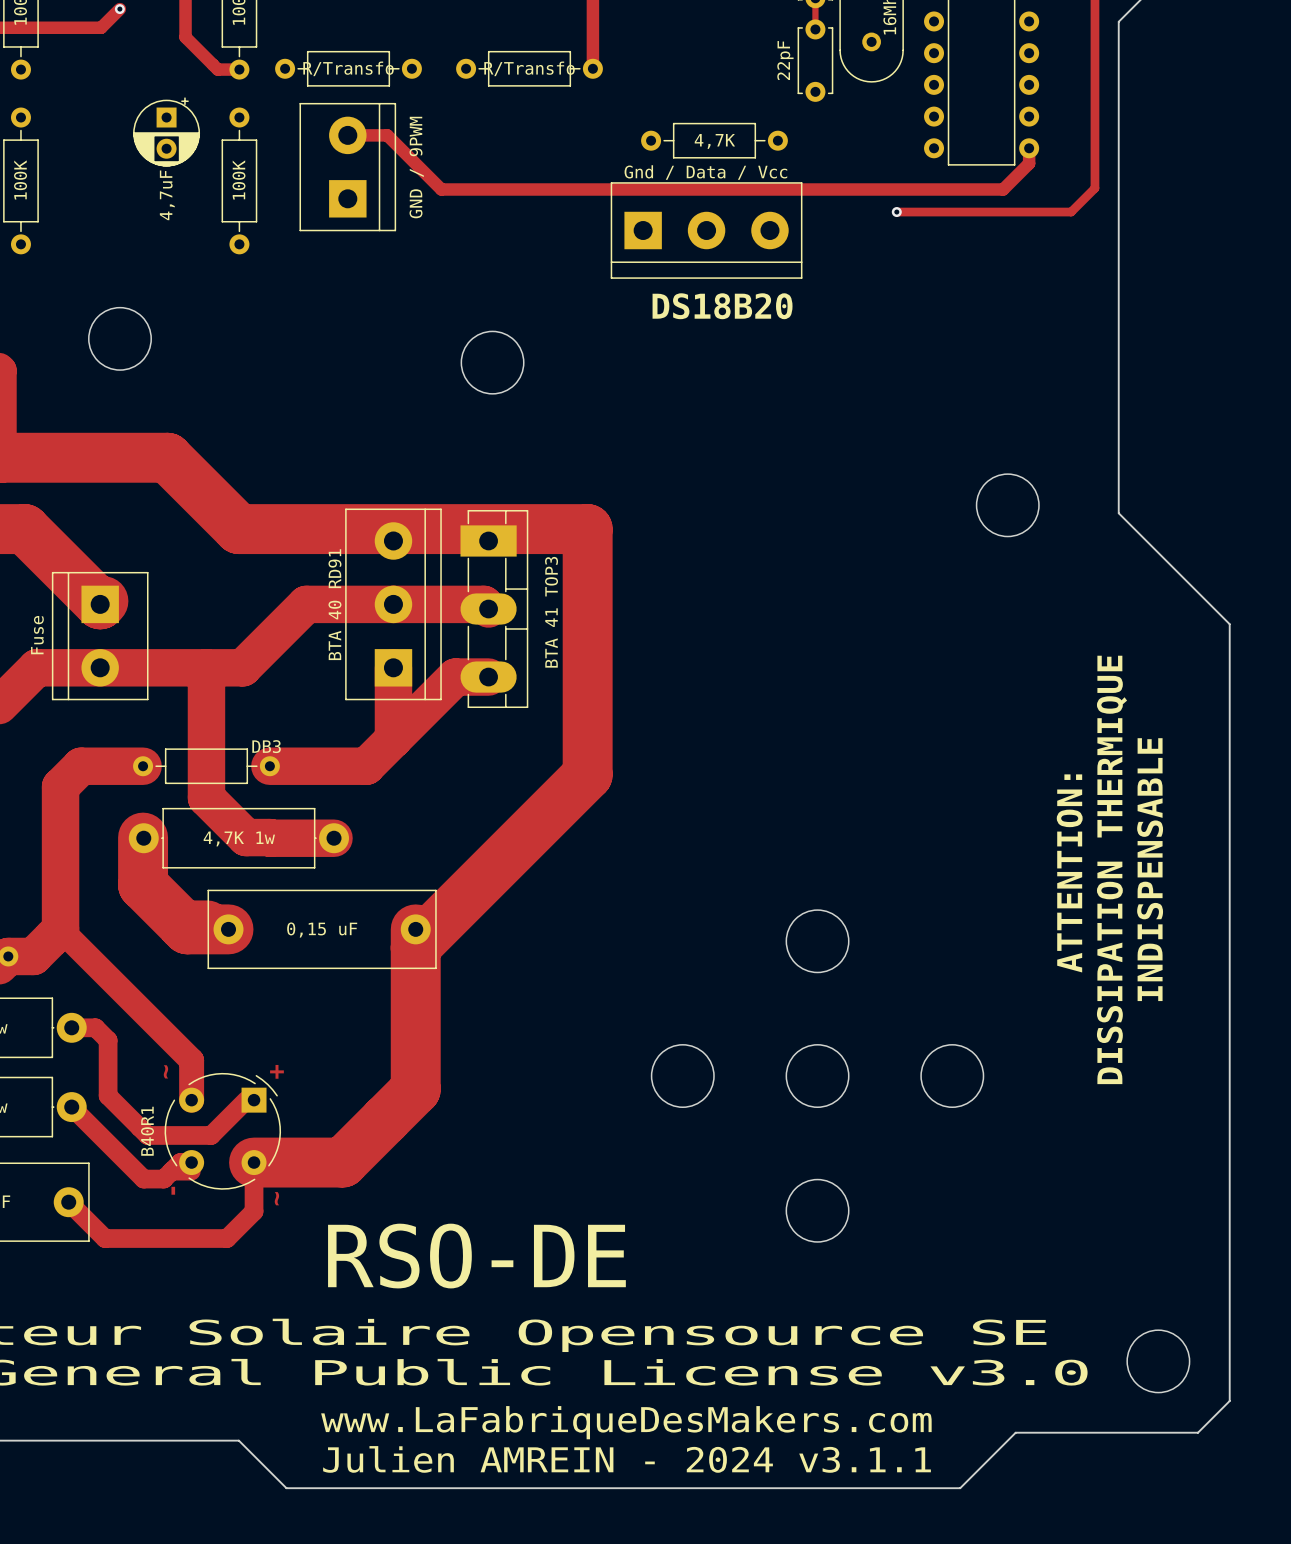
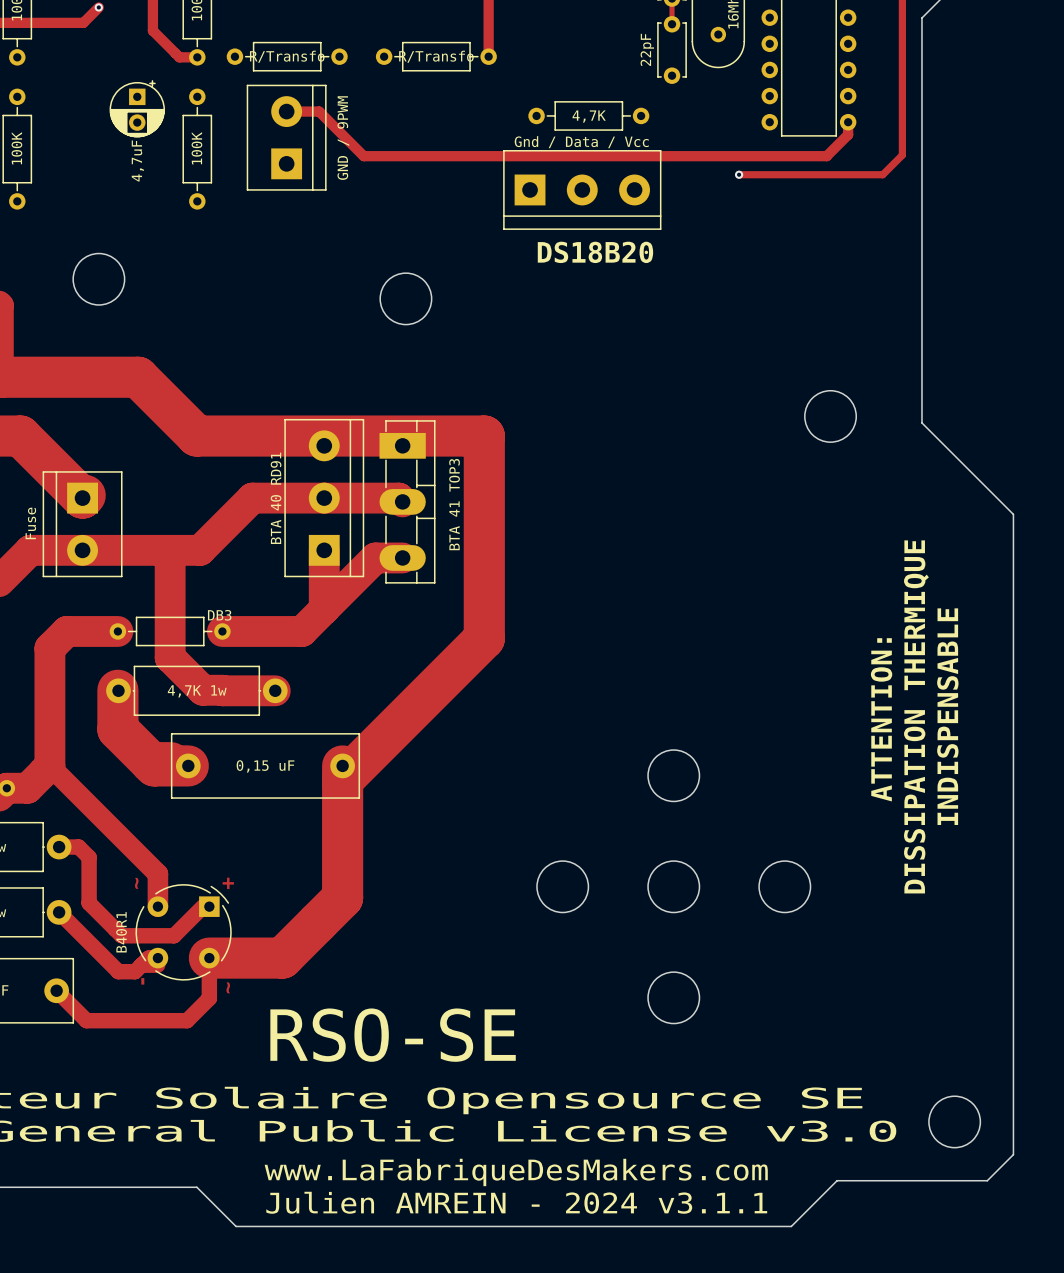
text: RSO-DE (476, 1256) -> RSO-SE (393, 1035)

